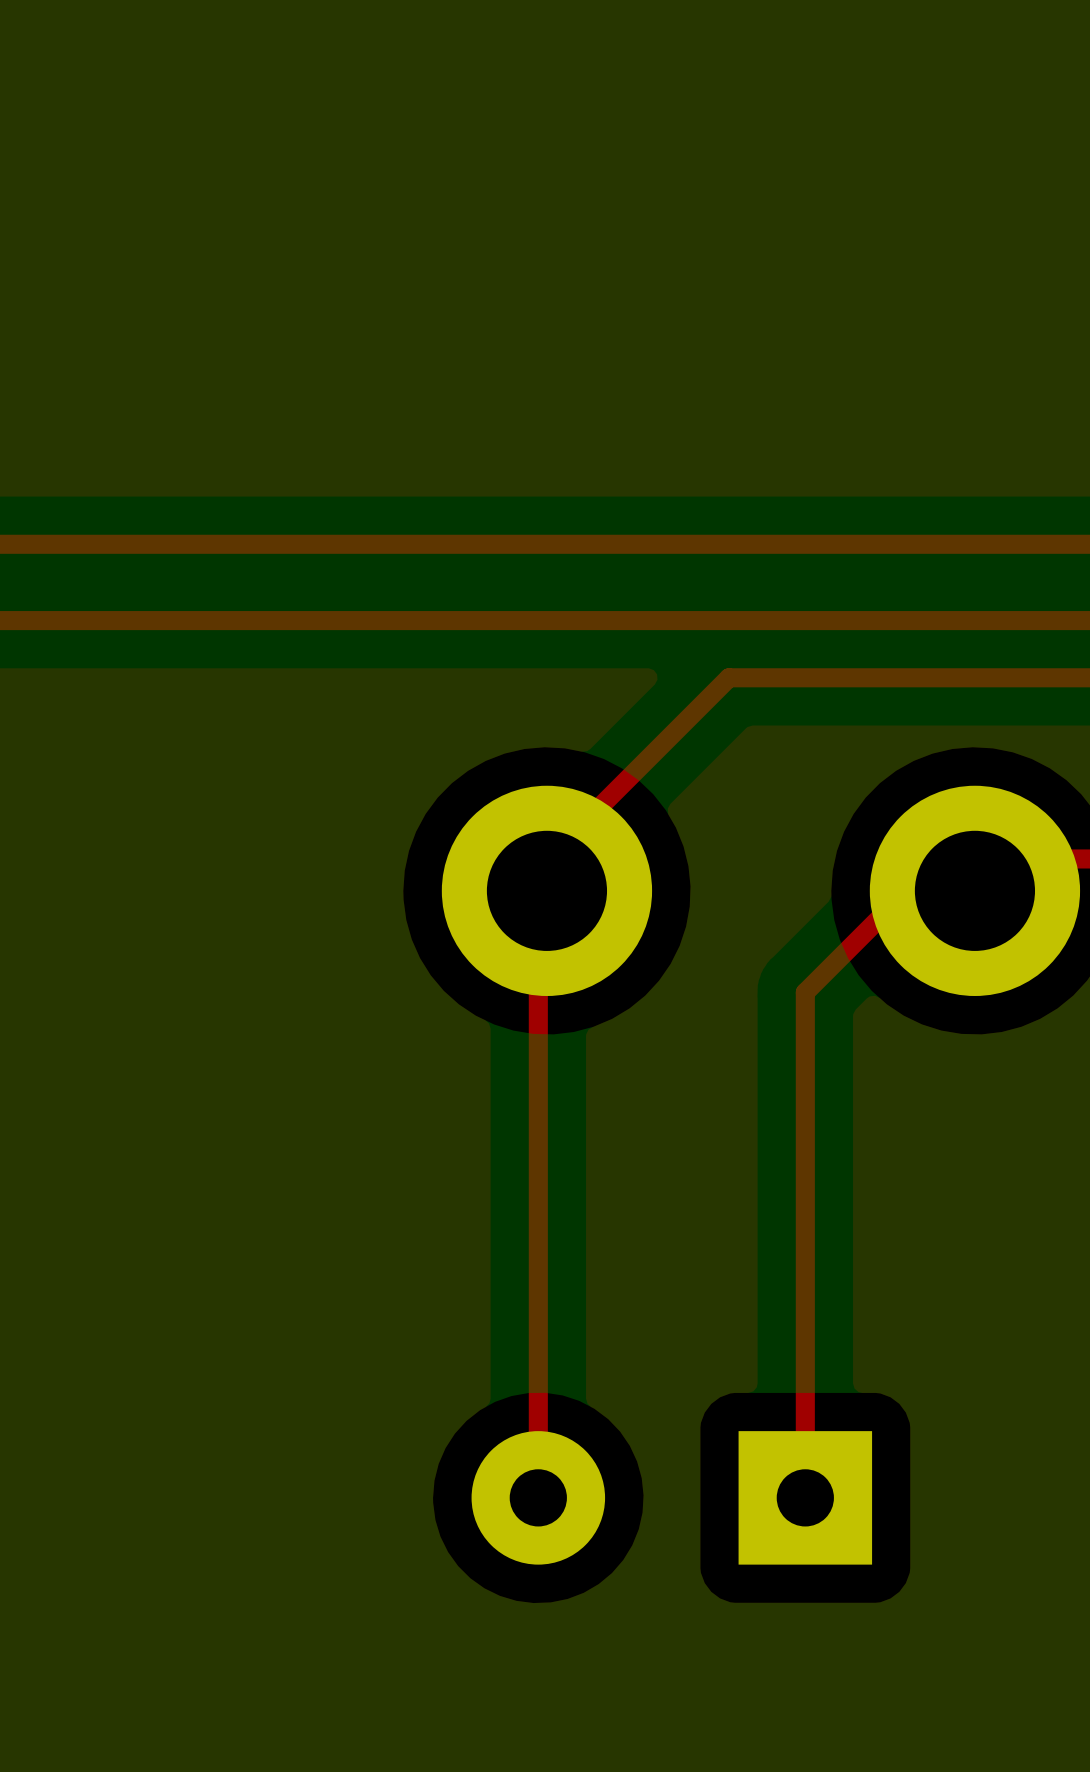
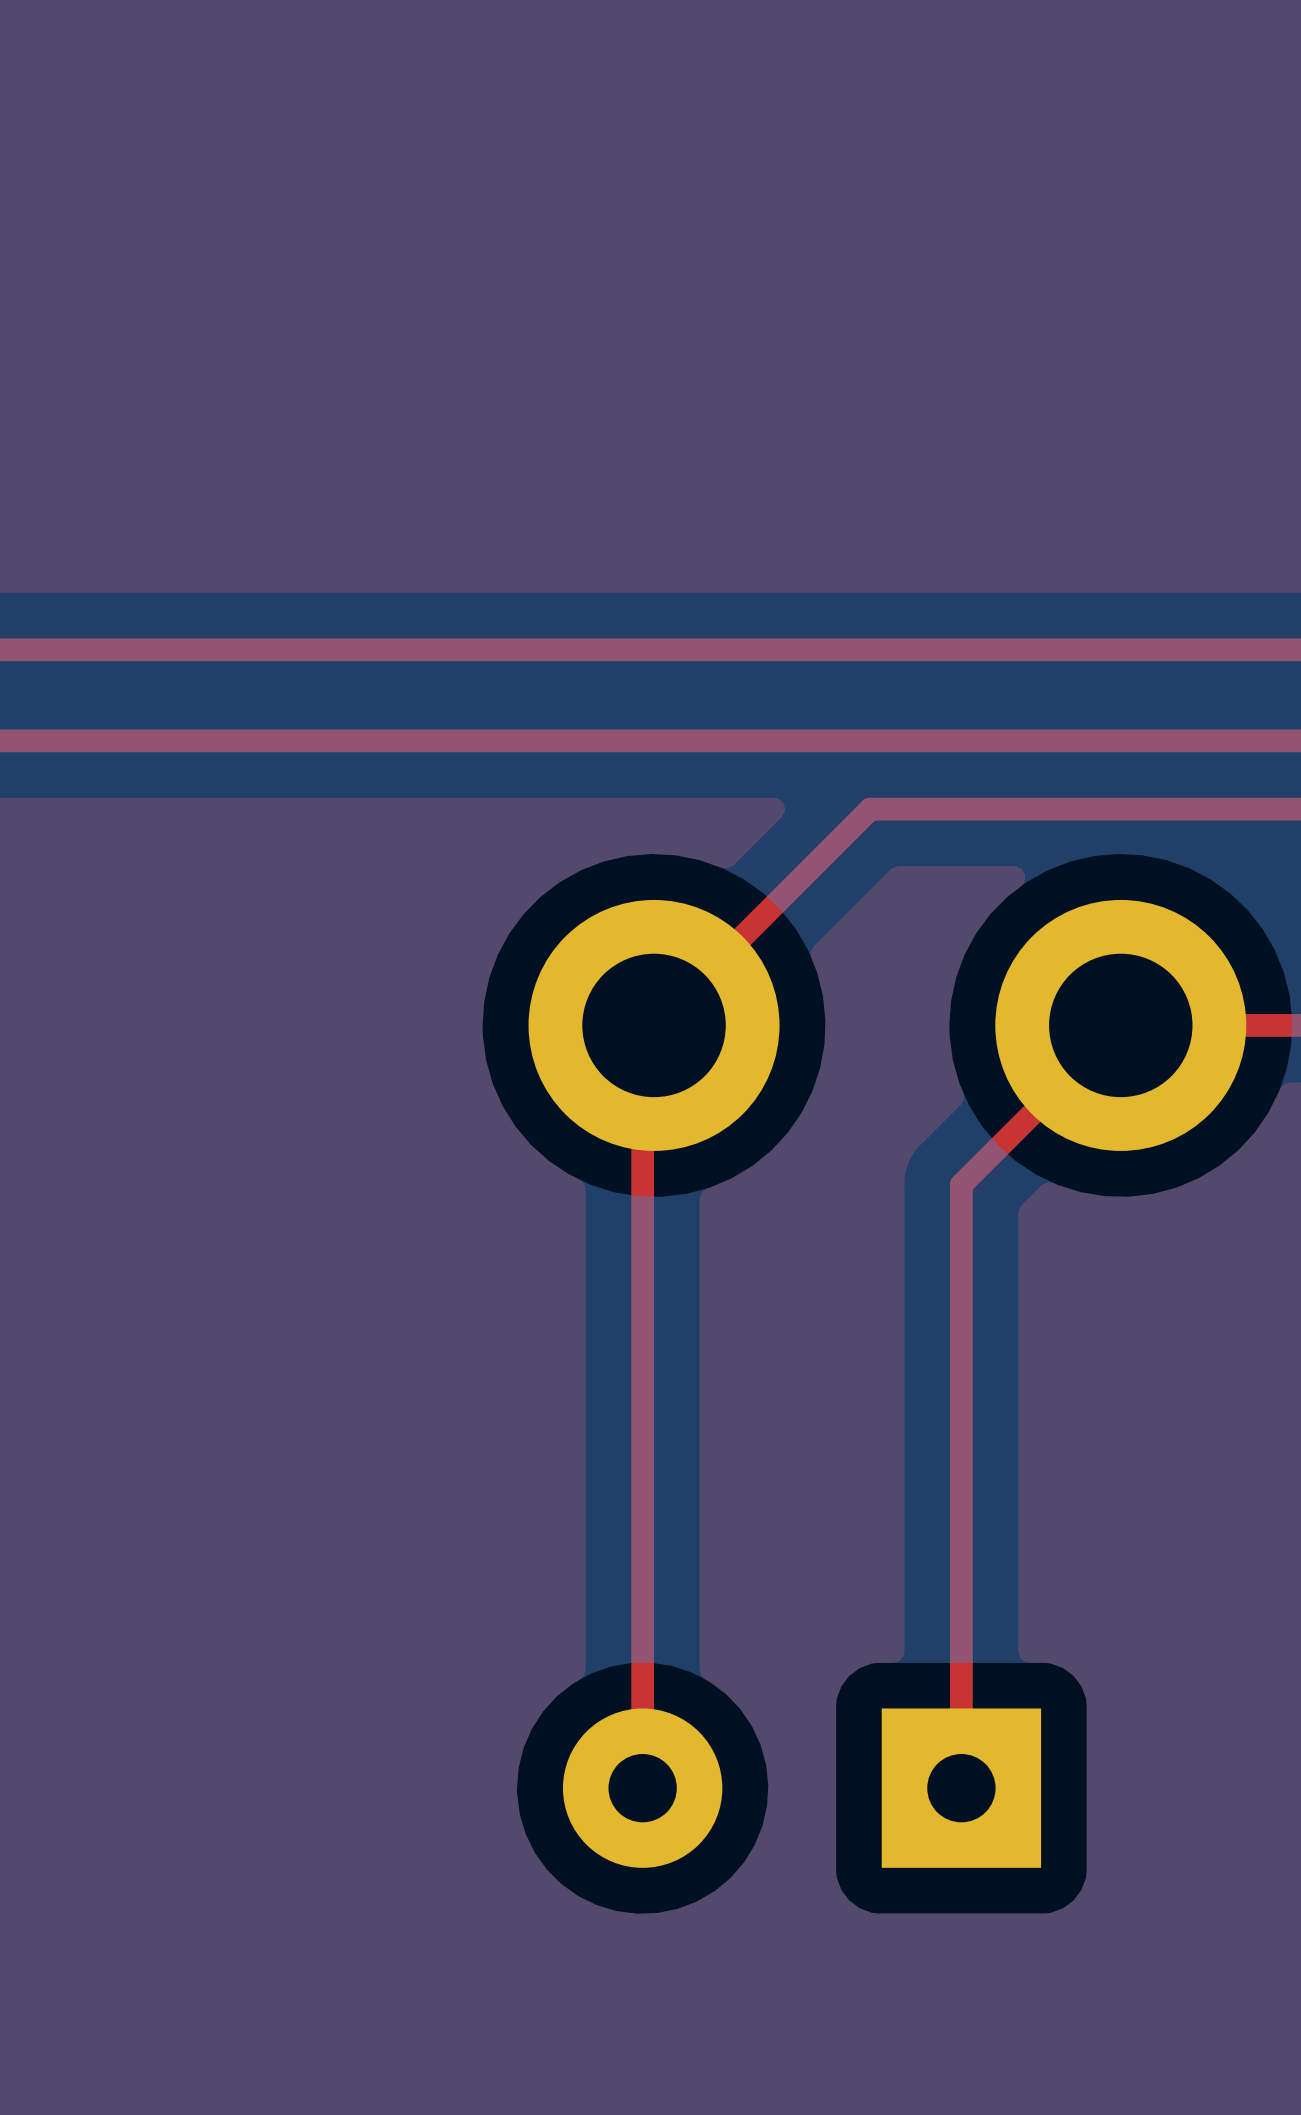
part position: (546, 890) -> (654, 1025)
part position: (974, 890) -> (1120, 1025)

